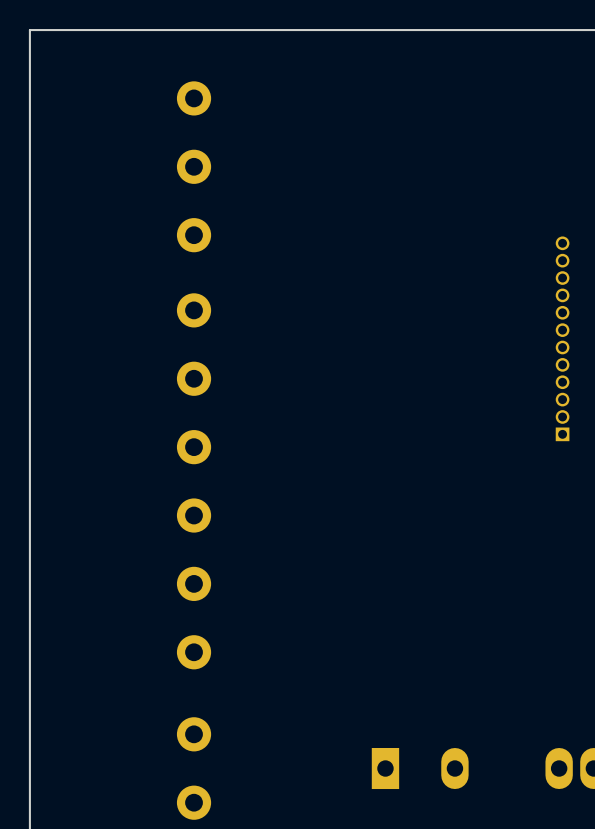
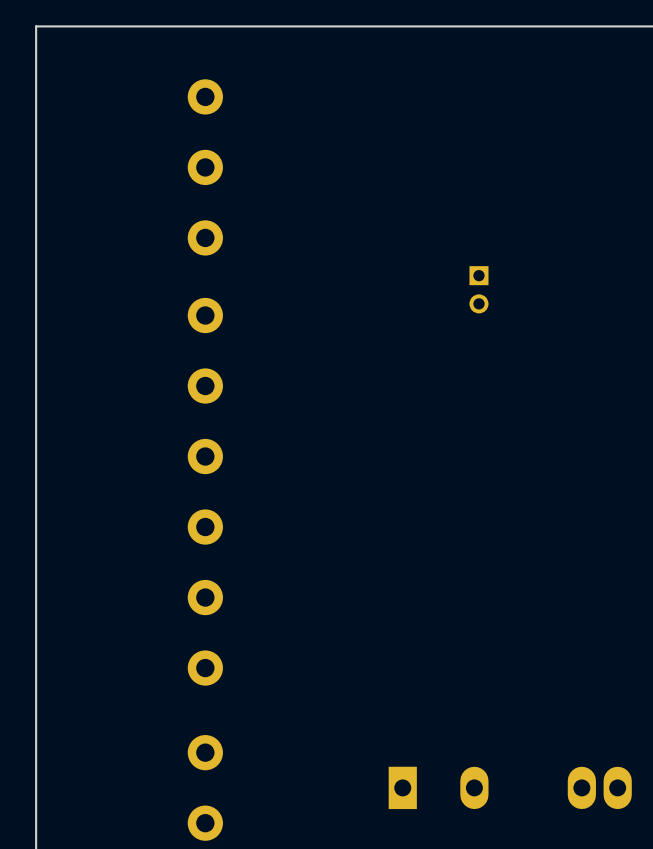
part: none -> (478, 289)
part: (562, 338) -> none

